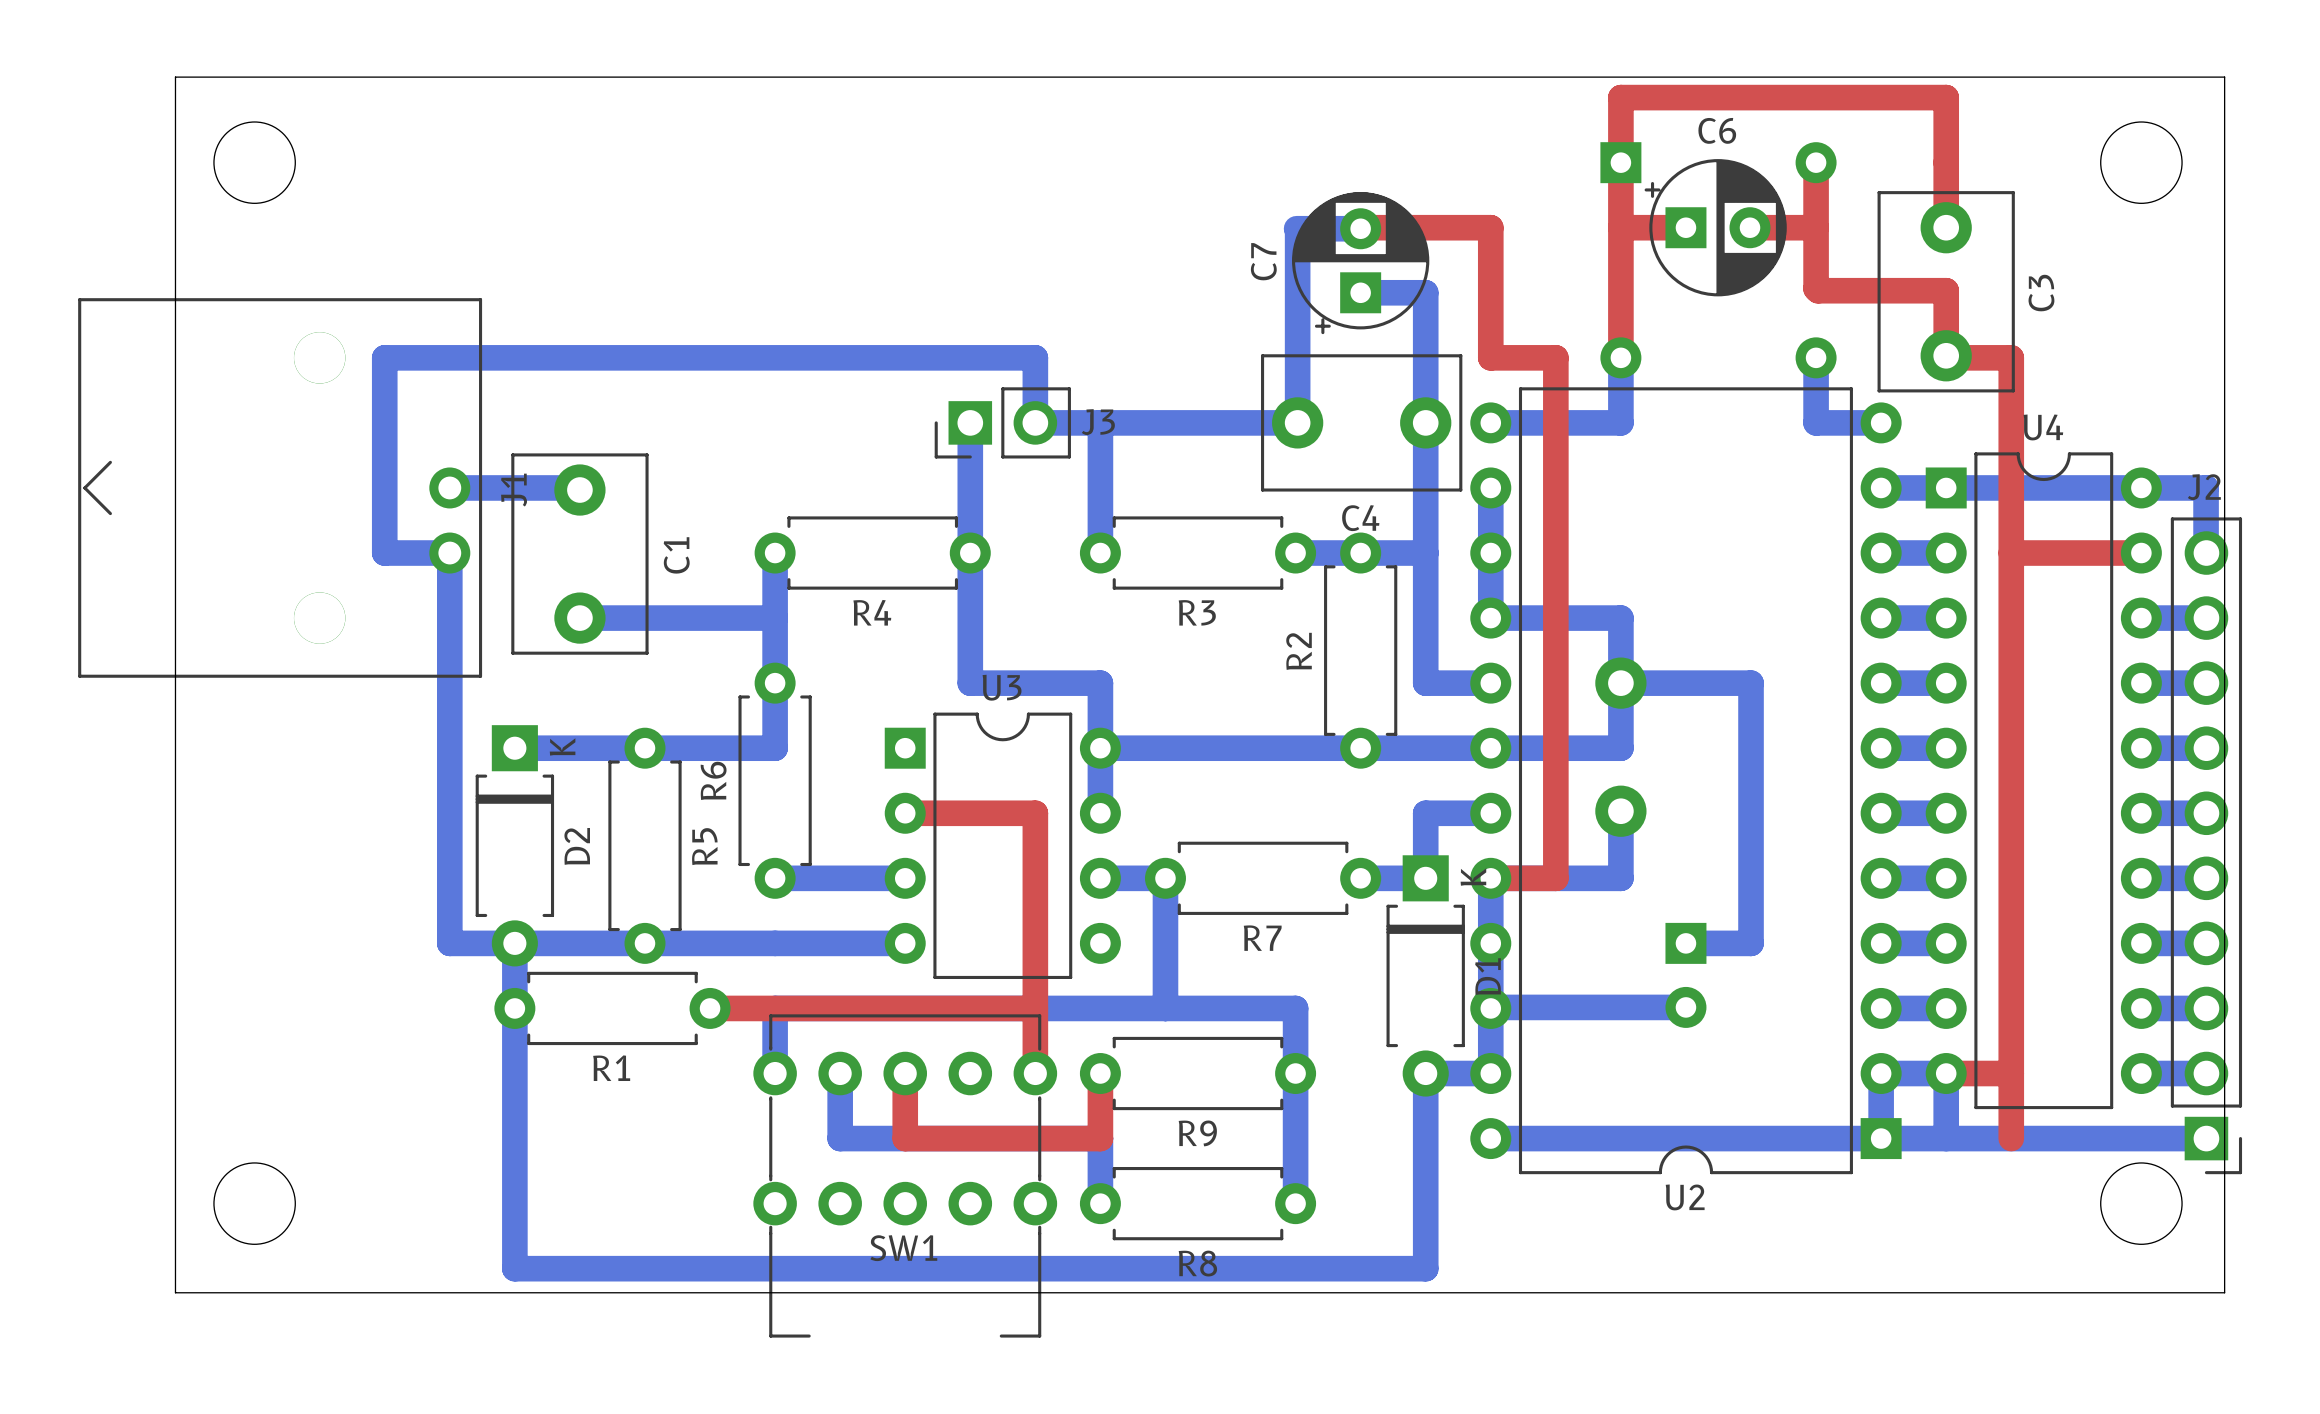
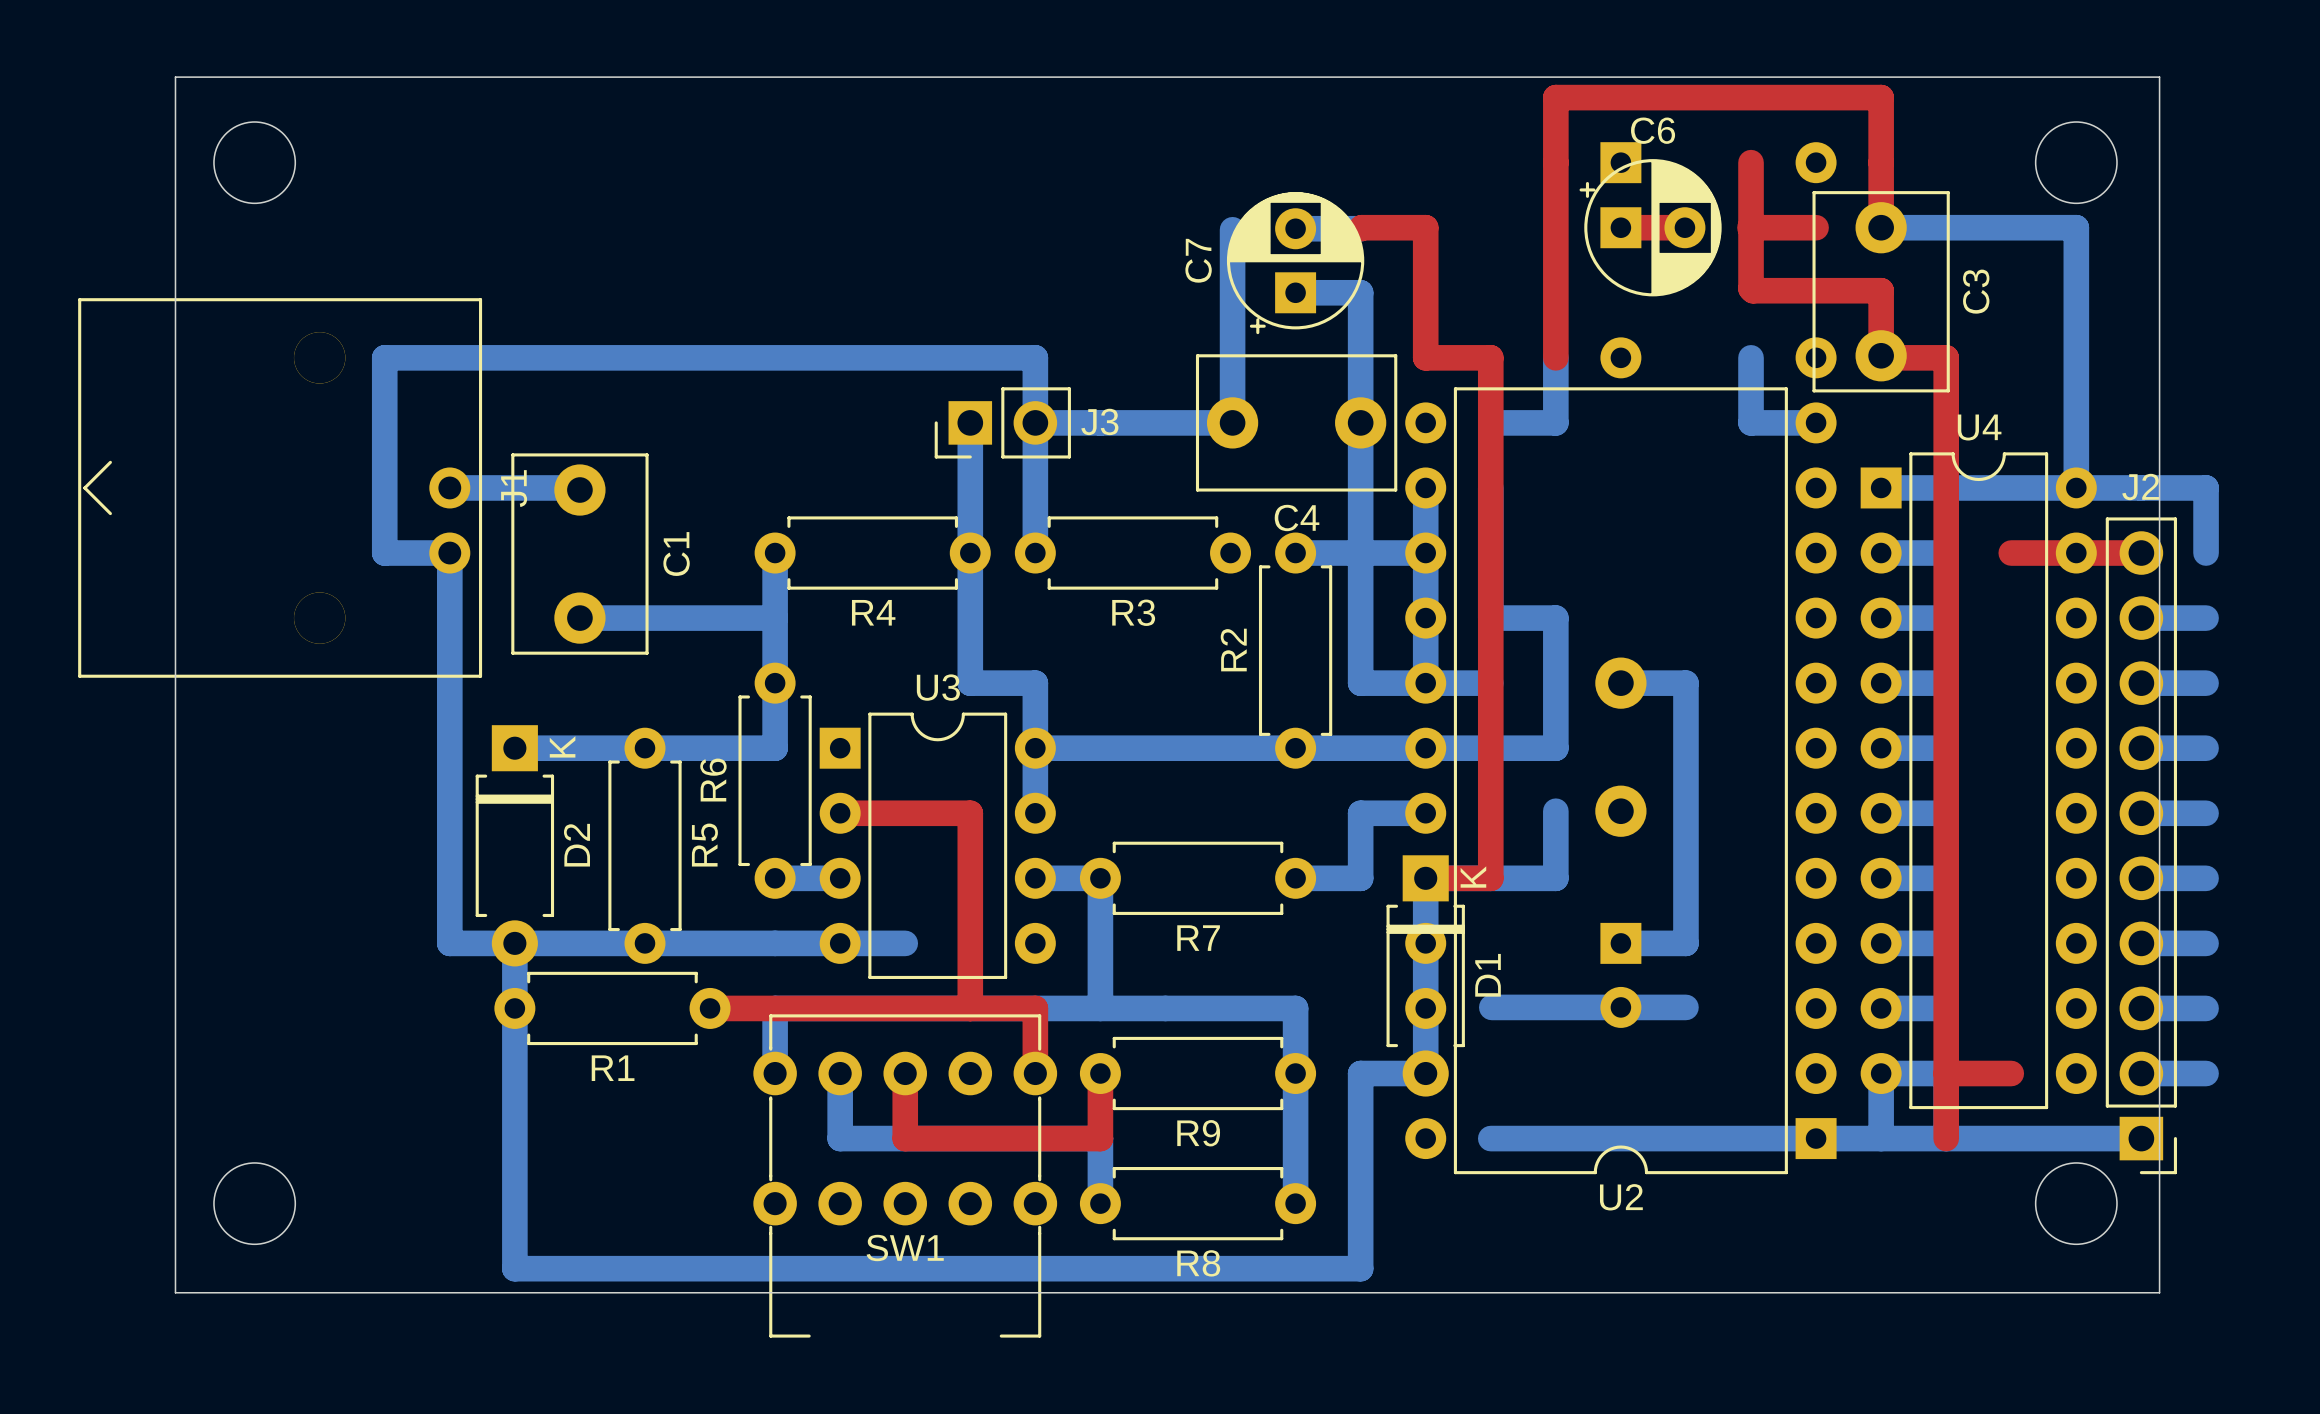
board edge: (2159, 77) (2224, 77) (2224, 1292) (2159, 1292) -> (2159, 77) (2159, 1292)
top track: (1620, 97) (1620, 357) -> (1620, 97) (1555, 97) (1555, 357)
top track: (1881, 97) (1946, 97) (1946, 227) -> (1881, 97) (1881, 227)
top track: (1816, 162) (1816, 288) (1818, 290) -> (1751, 162) (1751, 288) (1753, 290) (1818, 290)
round board edge position: (2141, 162) -> (2076, 162)
top track: (1425, 227) (1490, 227) (1490, 357) (1555, 357) (1555, 878) (1490, 878) -> (1425, 227) (1425, 357) (1490, 357) (1490, 878) (1425, 878)
C6 position: (1715, 227) -> (1650, 227)
bottom track: none -> (1881, 227) (2076, 227) (2076, 487)
bottom track: (1297, 229) (1297, 422) (1232, 422) -> (1232, 229) (1232, 422)
C7 position: (1360, 263) -> (1295, 263)
top track: (1881, 290) (1946, 290) (1946, 355) (1948, 357) (2011, 357) (2011, 1138) -> (1881, 290) (1881, 355) (1883, 357) (1946, 357) (1946, 1138)
C3 position: (1946, 291) -> (1881, 291)
bottom track: none -> (1295, 292) (1360, 292) (1360, 683) (1425, 683)
bottom track: (1360, 292) (1425, 292) (1425, 487) -> none
bottom track: (1620, 357) (1620, 422) (1555, 422) -> (1555, 357) (1555, 422)
bottom track: (1816, 357) (1816, 422) (1881, 422) -> (1751, 357) (1751, 422) (1816, 422)
bottom track: (1100, 422) (1100, 553) -> (1035, 422) (1035, 553)
C4 position: (1361, 422) -> (1296, 422)
R3 position: (1198, 553) -> (1132, 553)
bottom track: (1555, 618) (1620, 618) (1620, 748) (1555, 748) -> (1555, 618) (1555, 748)
R2 position: (1360, 650) -> (1295, 650)
bottom track: (1035, 683) (1100, 683) (1100, 813) -> (1035, 683) (1035, 813)
bottom track: (1685, 683) (1751, 683) (1751, 943) (1685, 943) -> (1685, 683) (1685, 943) (1620, 943)
U2 position: (1685, 780) -> (1620, 780)
U4 position: (2043, 780) -> (1978, 780)
bottom track: (1620, 811) (1620, 878) (1555, 878) -> (1555, 811) (1555, 878)
top track: none -> (840, 813) (905, 813)
top track: (970, 813) (1035, 813) (1035, 1008) -> (970, 813) (970, 1008)
bottom track: (1490, 813) (1425, 813) (1425, 878) (1360, 878) -> (1425, 813) (1360, 813) (1360, 878) (1295, 878)
U3 position: (1002, 845) -> (937, 845)
J2 position: (2206, 845) -> (2141, 845)
bottom track: (840, 878) (905, 878) -> (1035, 748) (1100, 748)
bottom track: (1100, 878) (1165, 878) (1165, 1008) -> (1035, 878) (1100, 878) (1100, 1008)
R7 position: (1263, 878) -> (1198, 878)
bottom track: (1490, 878) (1490, 1073) (1425, 1073) (1425, 1268) (1360, 1268) -> (1490, 878) (1425, 878) (1425, 1073) (1360, 1073) (1360, 1268)
part position: (1685, 975) -> (1620, 975)
bottom track: (2141, 1138) (2206, 1138) -> none
round board edge position: (2141, 1203) -> (2076, 1203)

